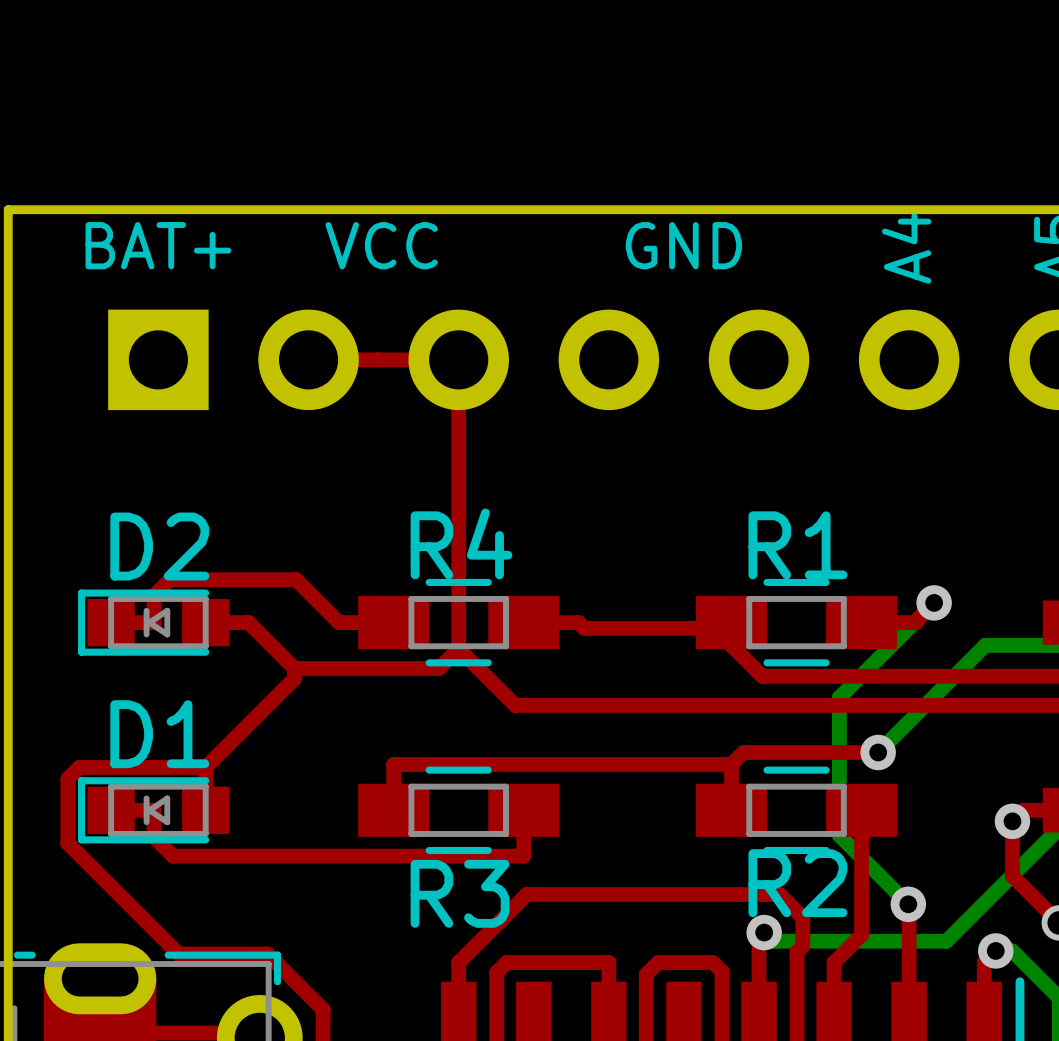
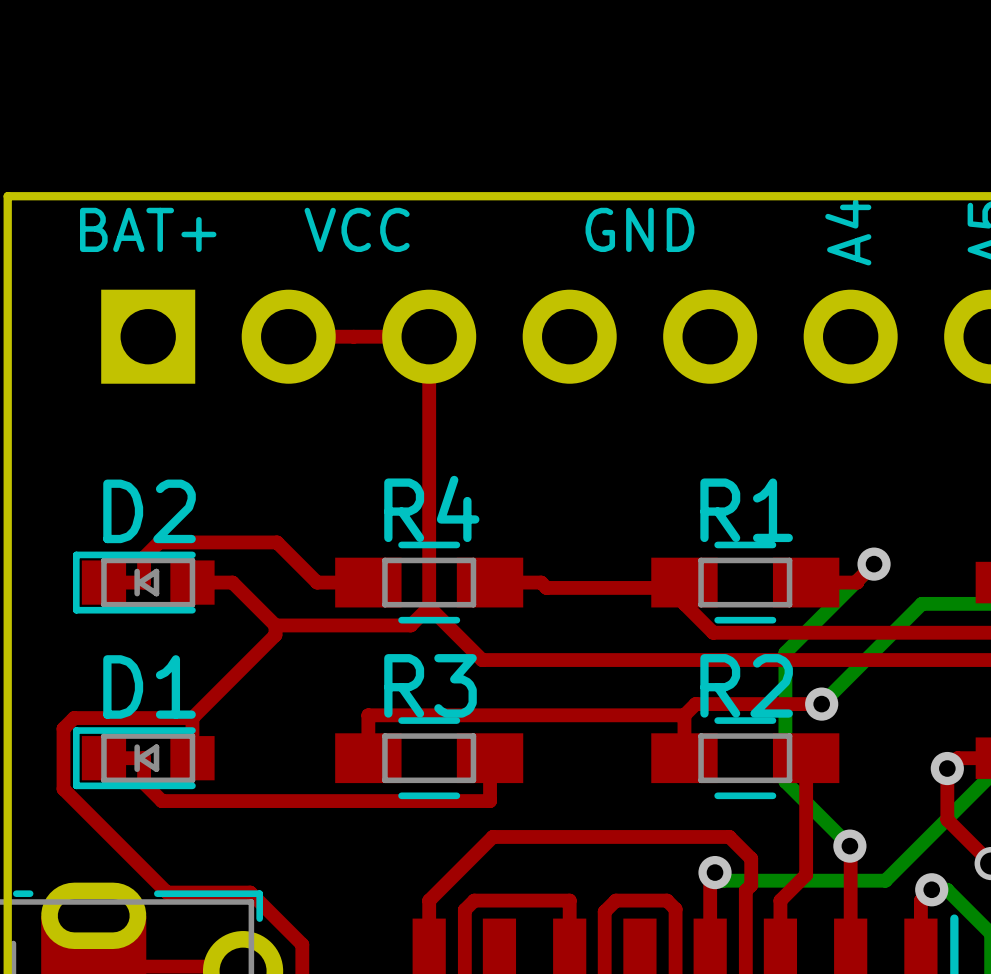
R2 name position: R2 (797, 883) -> R2 (746, 685)
R3 name position: R3 (460, 893) -> R3 (430, 685)

